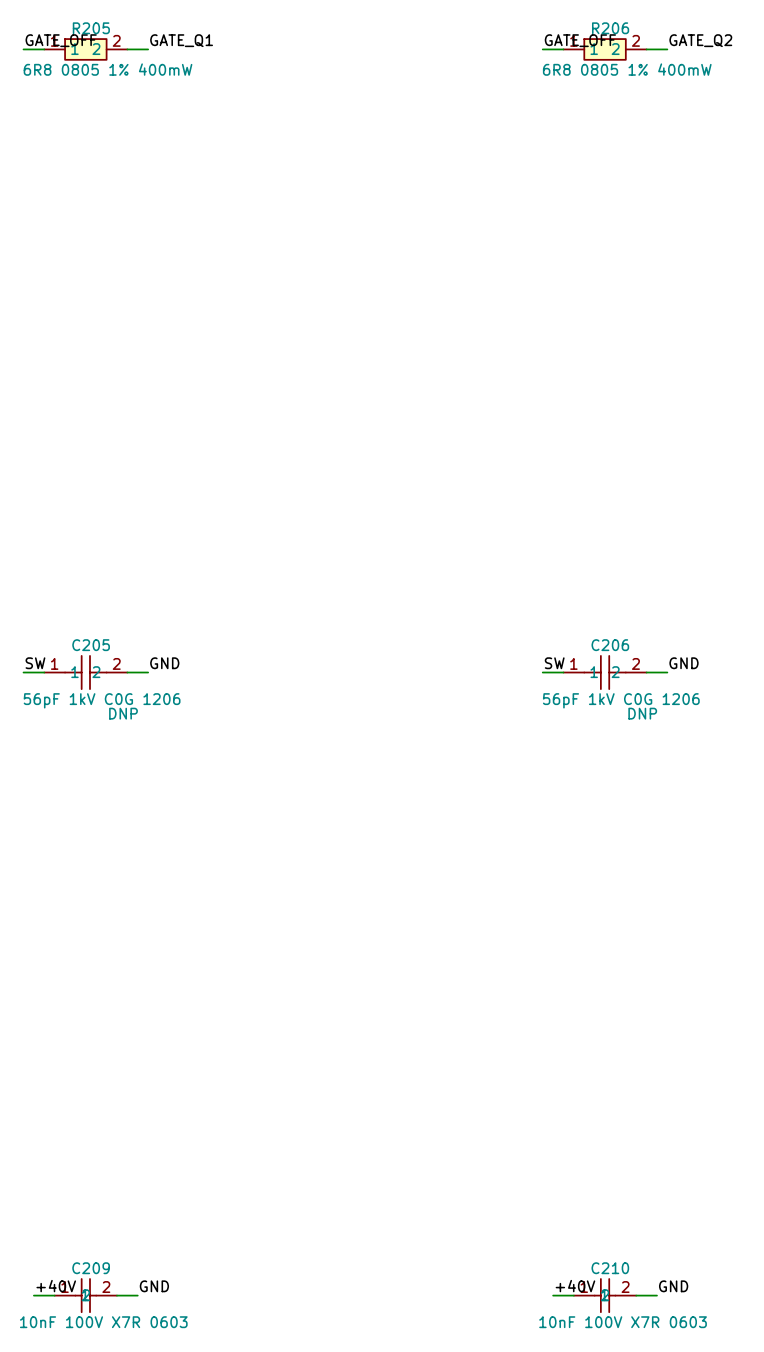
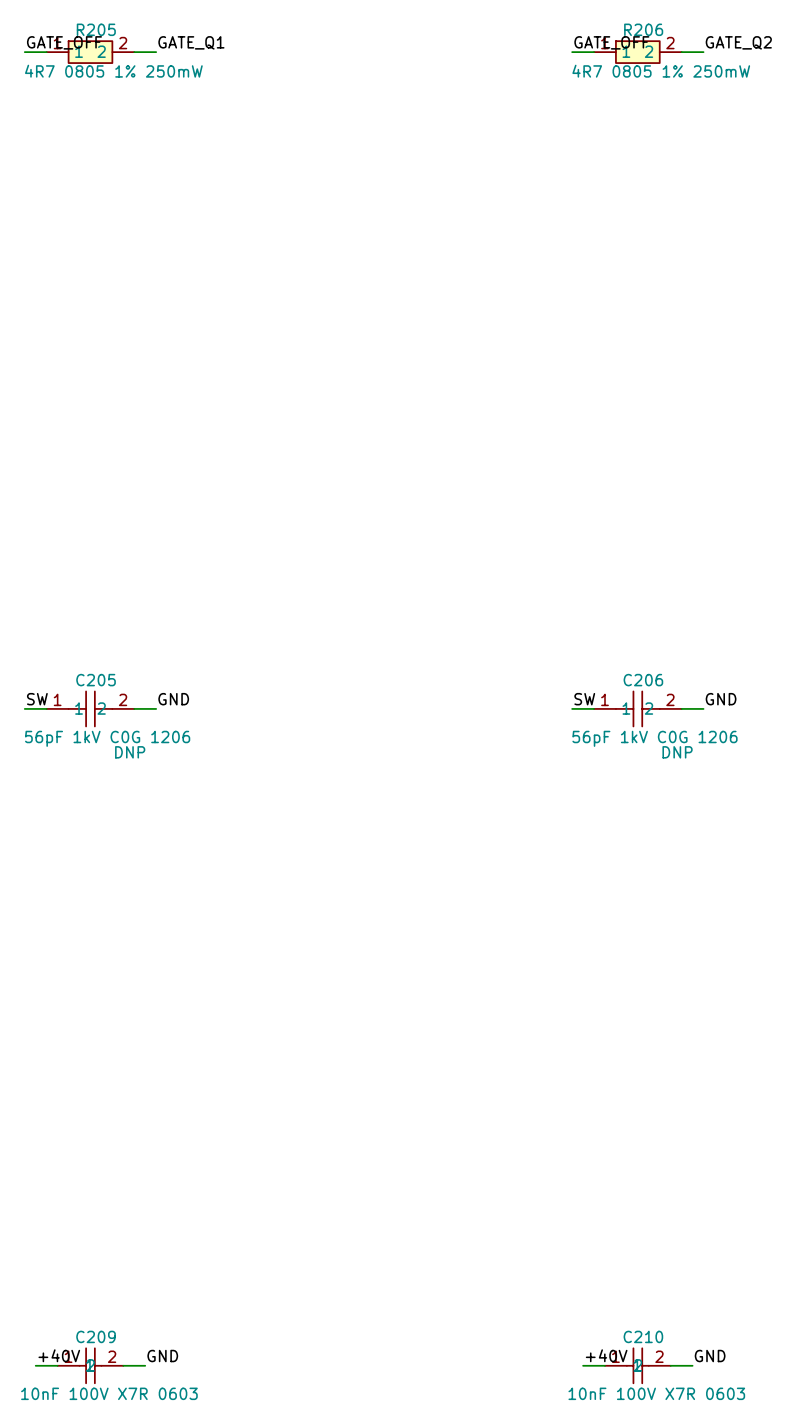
R205 value: 6R8 0805 1% 400mW (108, 69) -> 4R7 0805 1% 250mW (113, 71)
R206 value: 6R8 0805 1% 400mW (627, 69) -> 4R7 0805 1% 250mW (661, 71)

